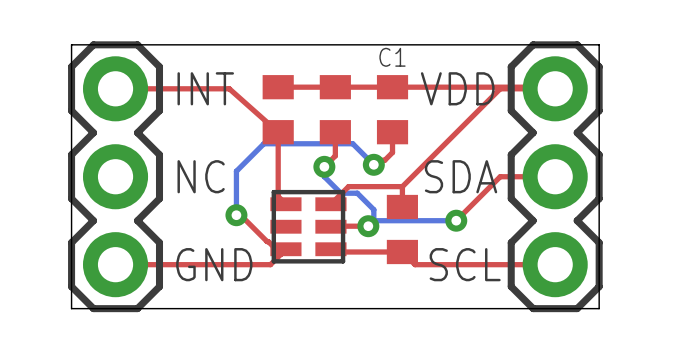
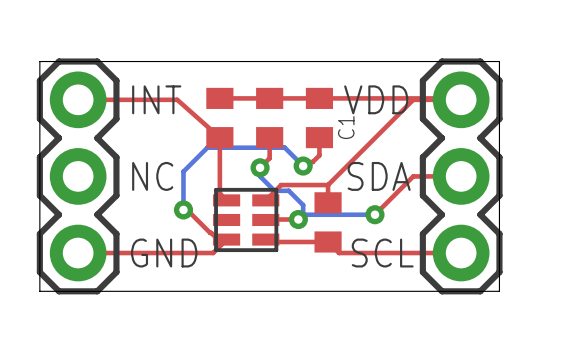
C1 name rotation: 0° (392, 57) -> 90° counterclockwise (346, 127)
C1 name position: C1 (392, 57) -> C1 (346, 127)

